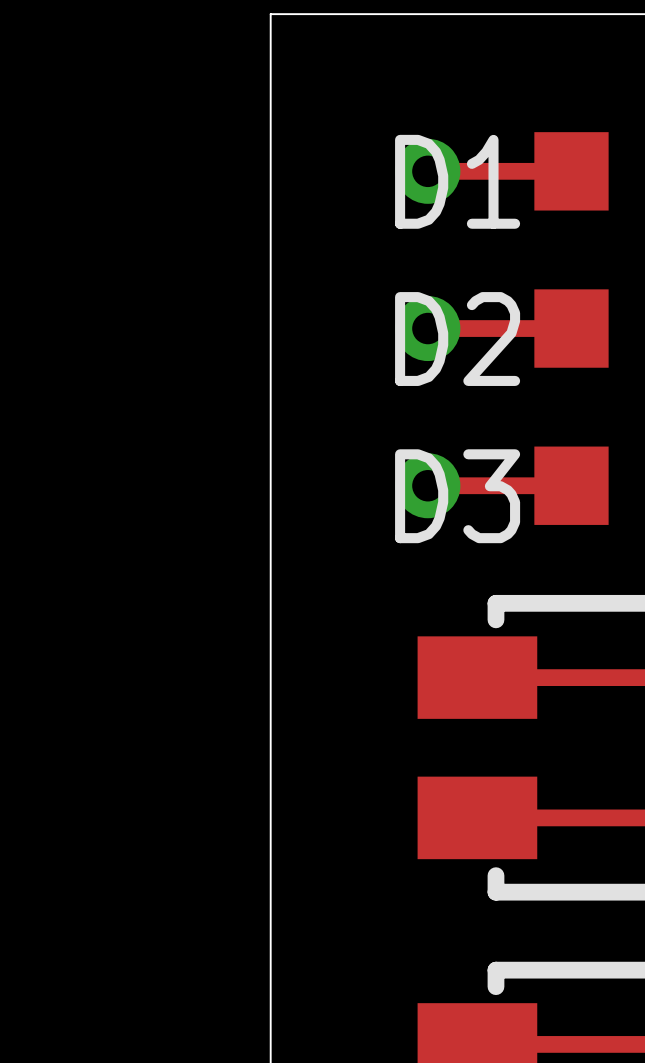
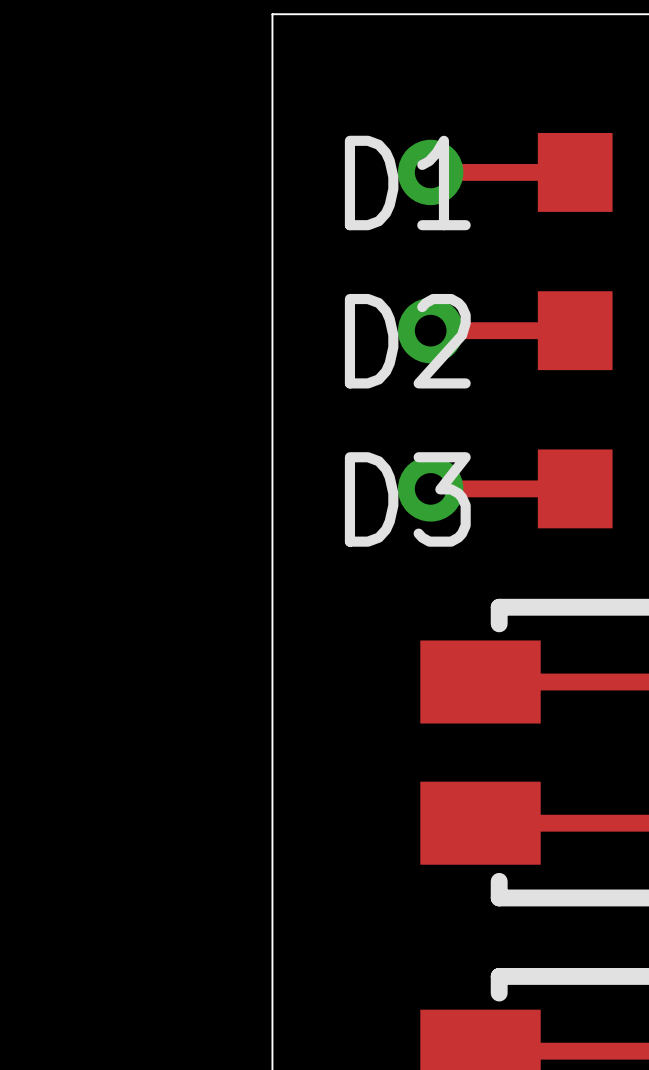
D1 name position: D1 (457, 181) -> D1 (407, 182)
D2 name position: D2 (457, 339) -> D2 (407, 341)
D3 name position: D3 (457, 496) -> D3 (407, 499)

